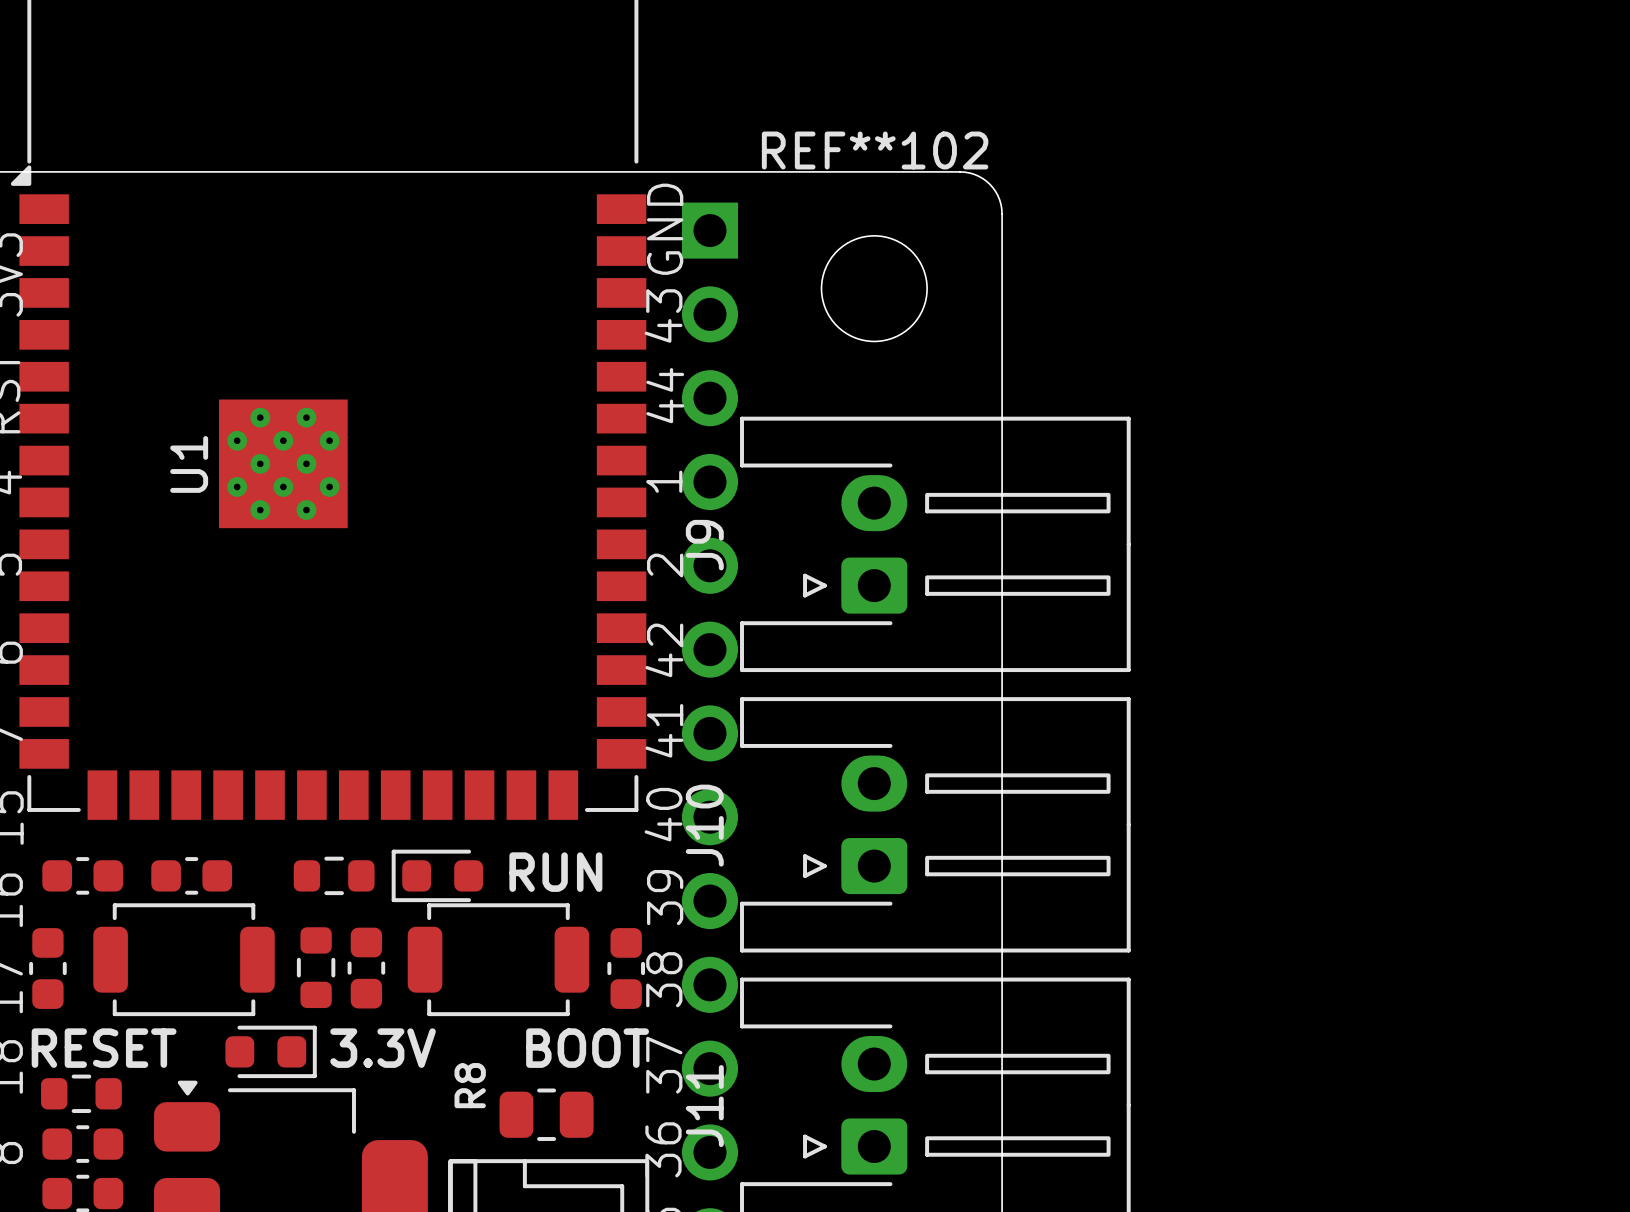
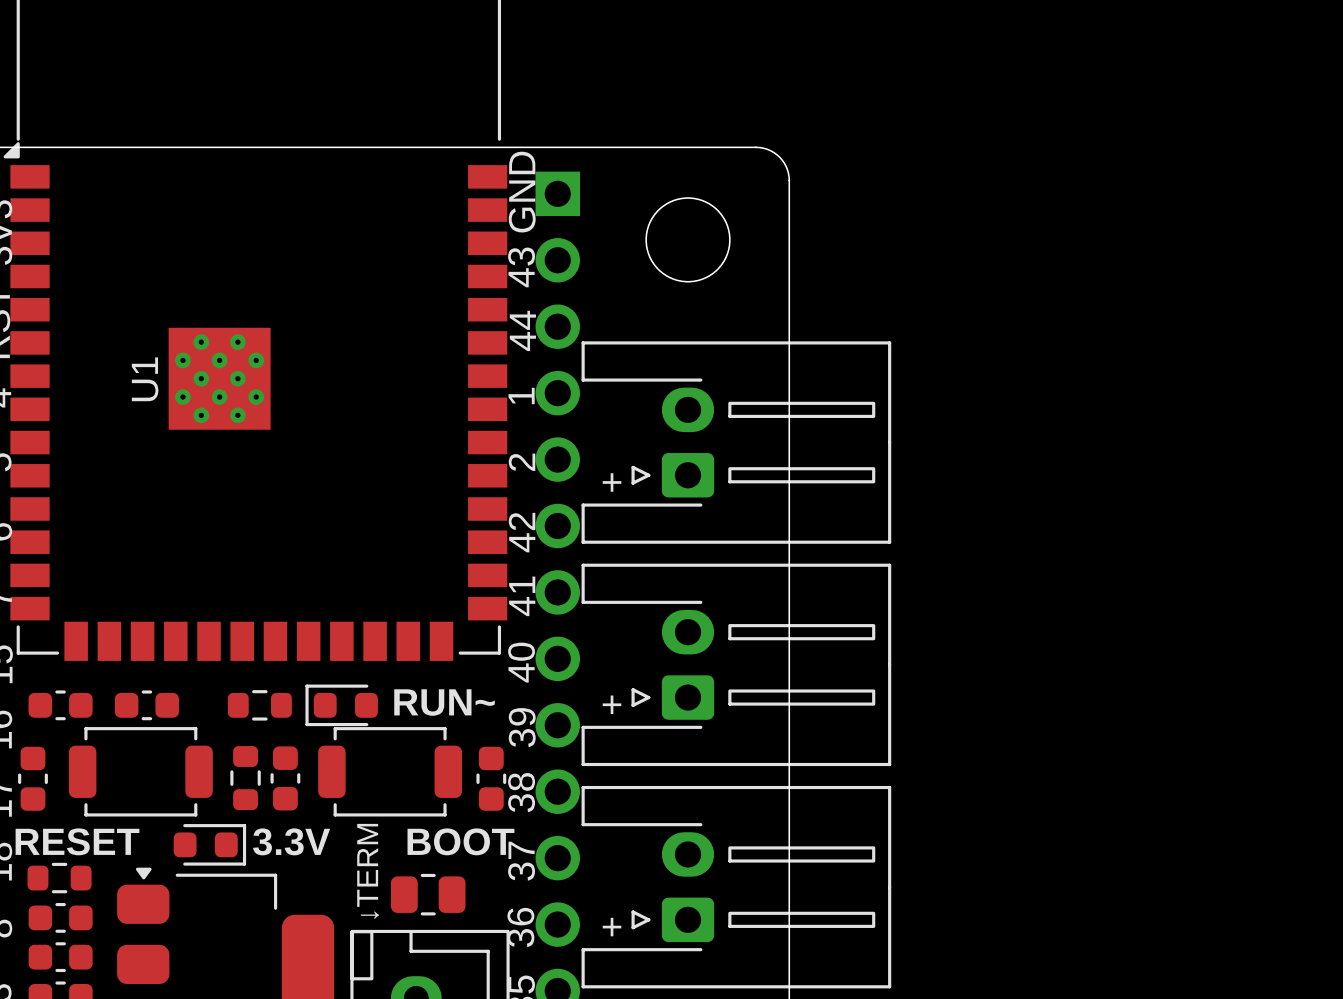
REF**102 name: REF**102 (875, 150) -> none
J9 name: J9 (704, 545) -> none
text: none -> + (612, 482)
J10 name: J10 (704, 825) -> none
text: none -> + (612, 704)
text: RUN (555, 872) -> RUN~ (444, 702)
R8 name: R8 (470, 1085) -> ↓TERM (368, 871)
J11 name: J11 (704, 1106) -> none
text: none -> + (612, 927)

